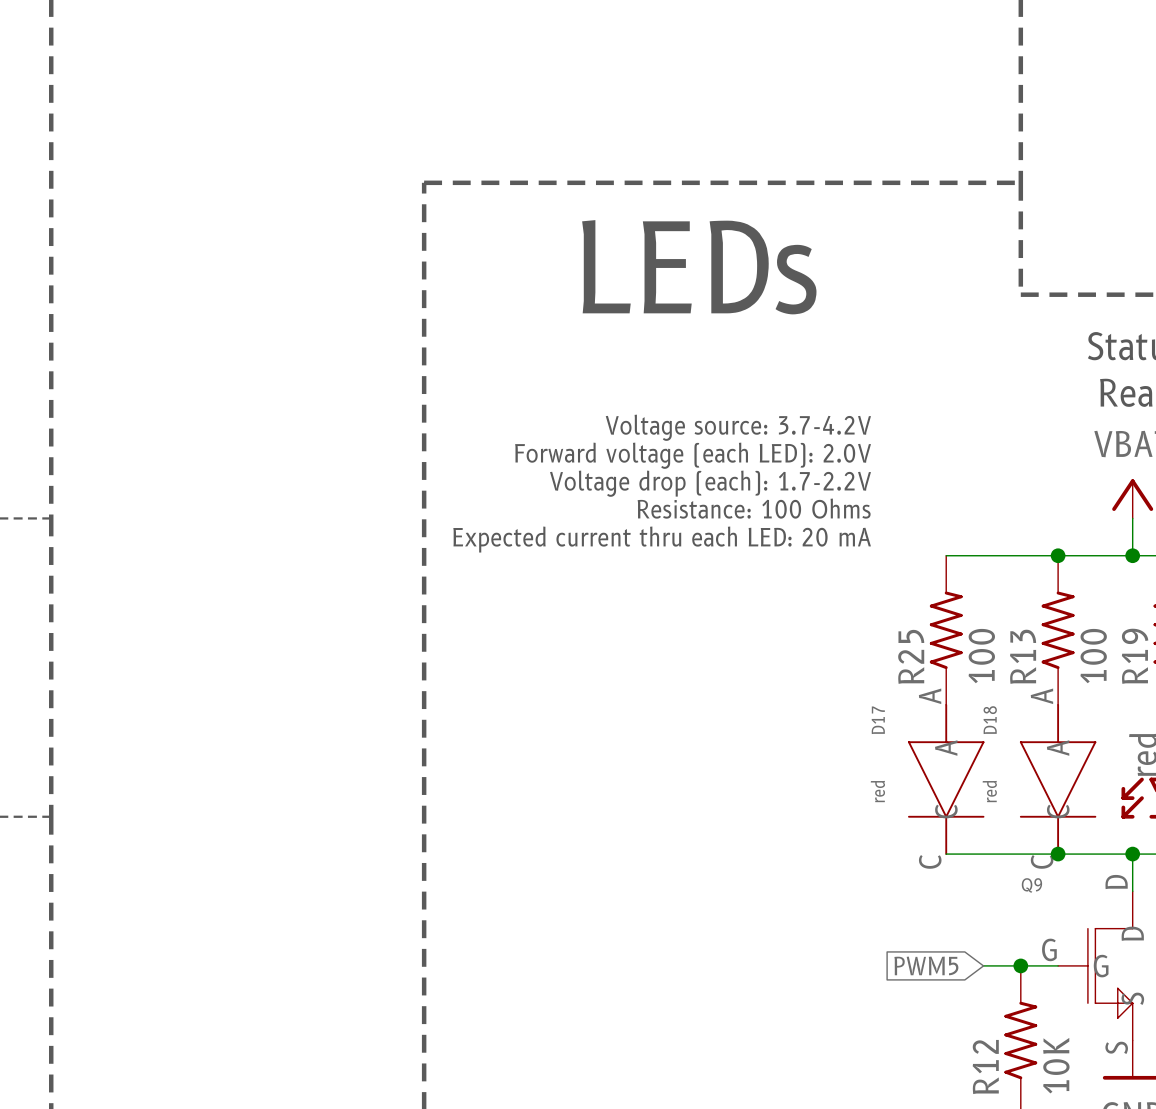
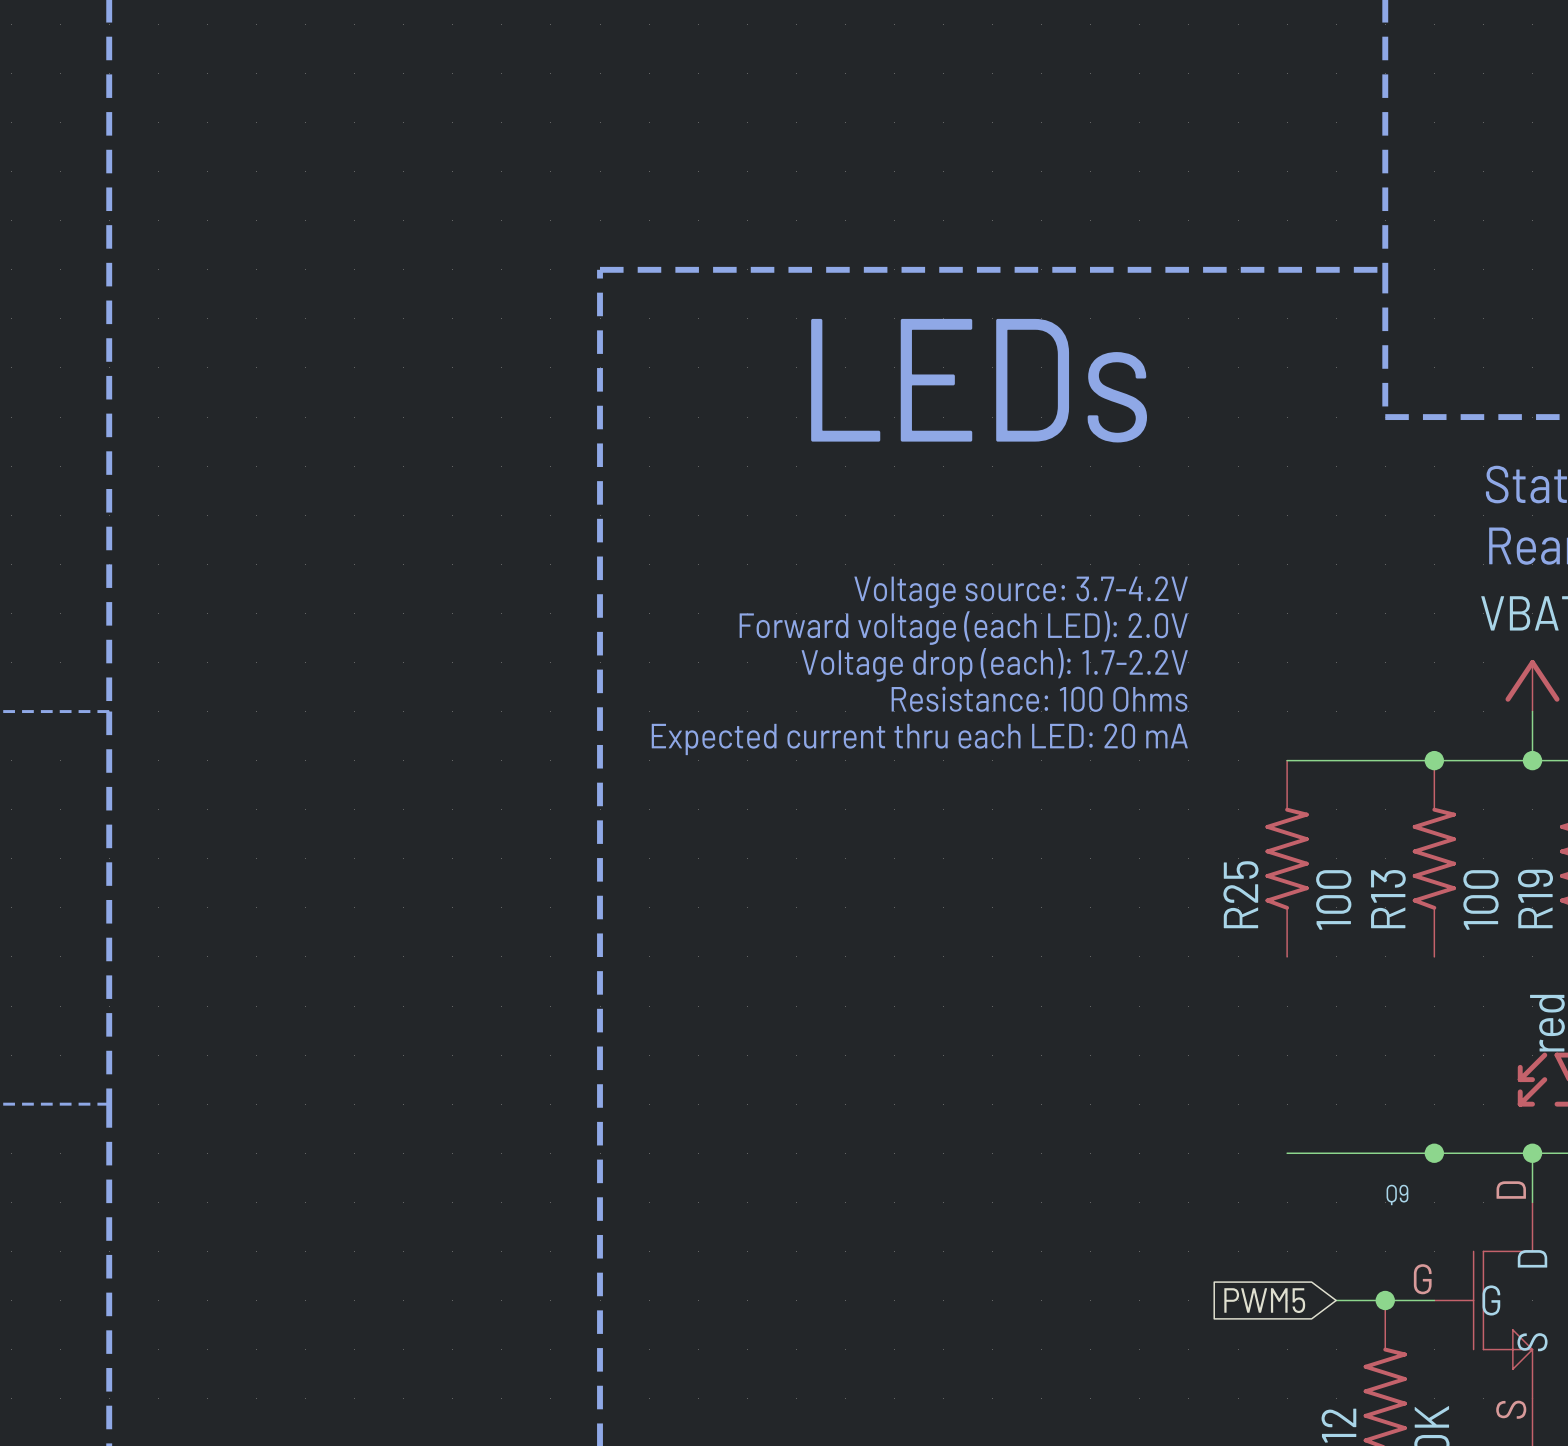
D17: red (946, 779) -> none
D18: red (1058, 779) -> none

